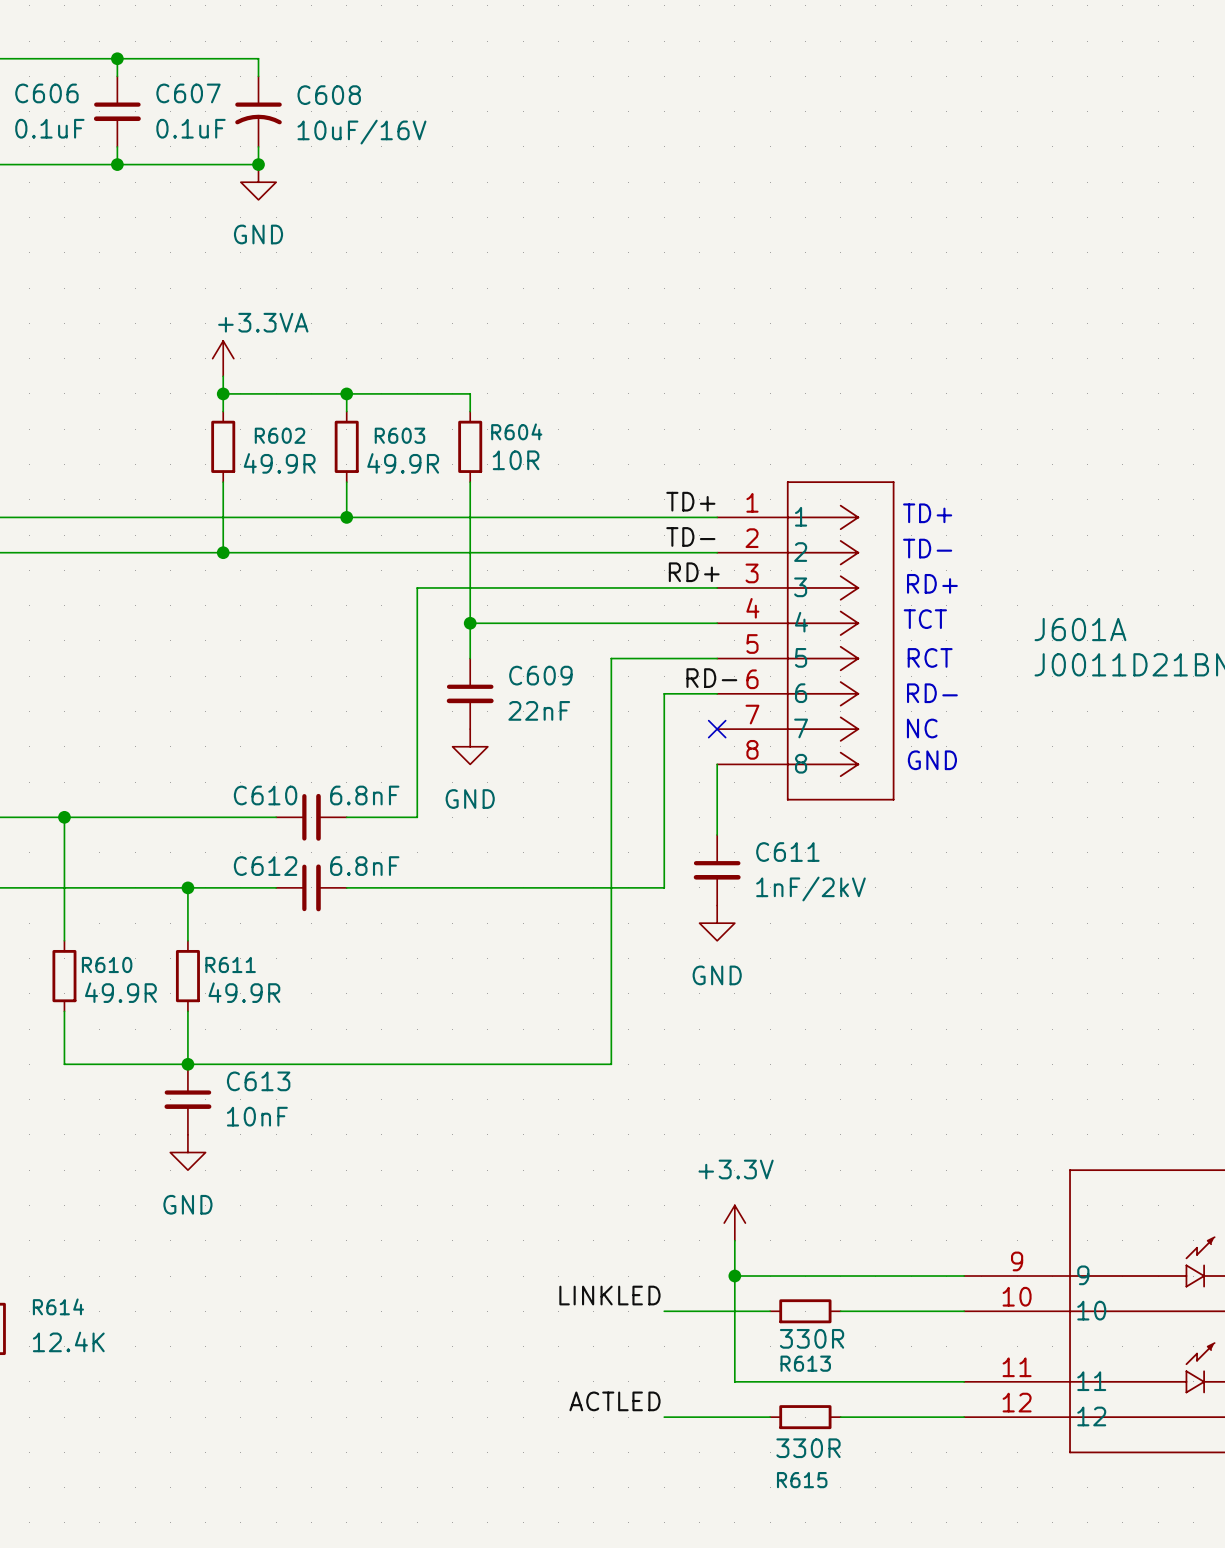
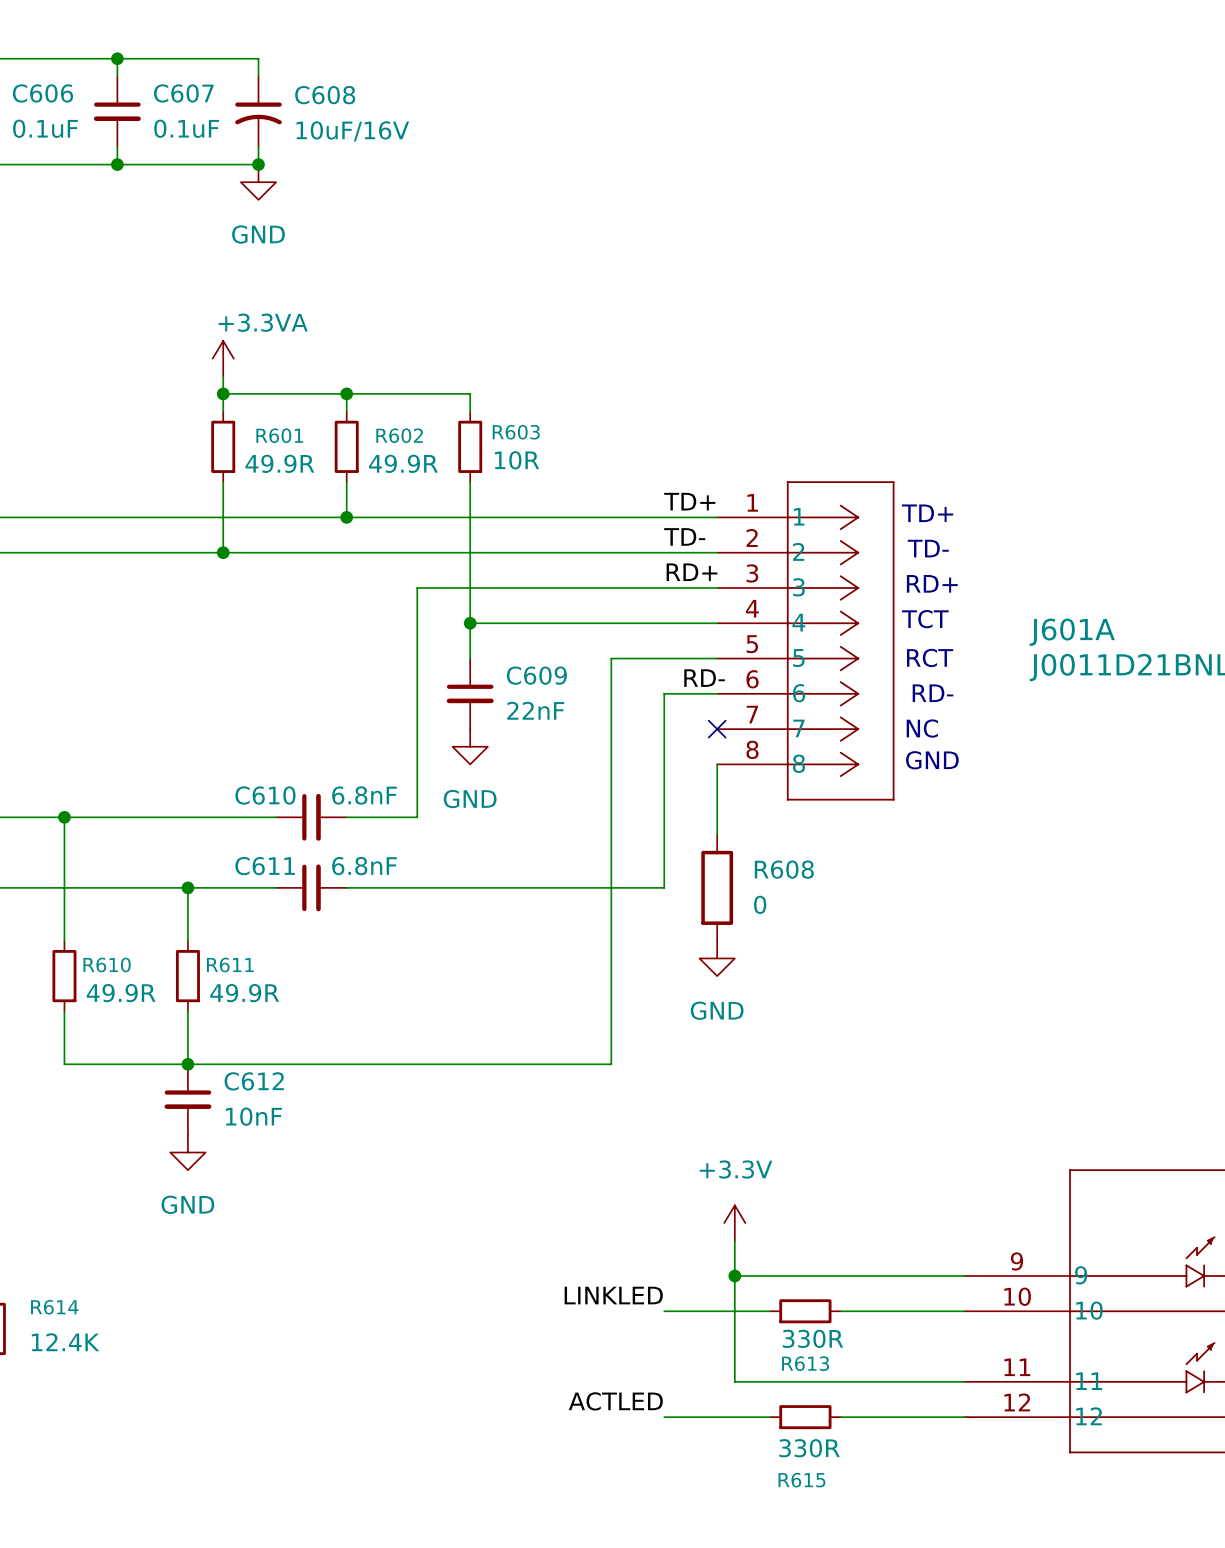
R604 name: R604 (516, 431) -> R603 (516, 432)
R602 name: R602 (280, 435) -> R601 (279, 435)
R603 name: R603 (399, 435) -> R602 (399, 435)
C612 name: C612 (265, 866) -> C611 (265, 866)
C611: 1nF/2kV (717, 870) -> none
R608: none -> 0 (717, 887)
power symbol position: GND (717, 923) -> GND (717, 958)
C613 name: C613 (258, 1081) -> C612 (254, 1081)

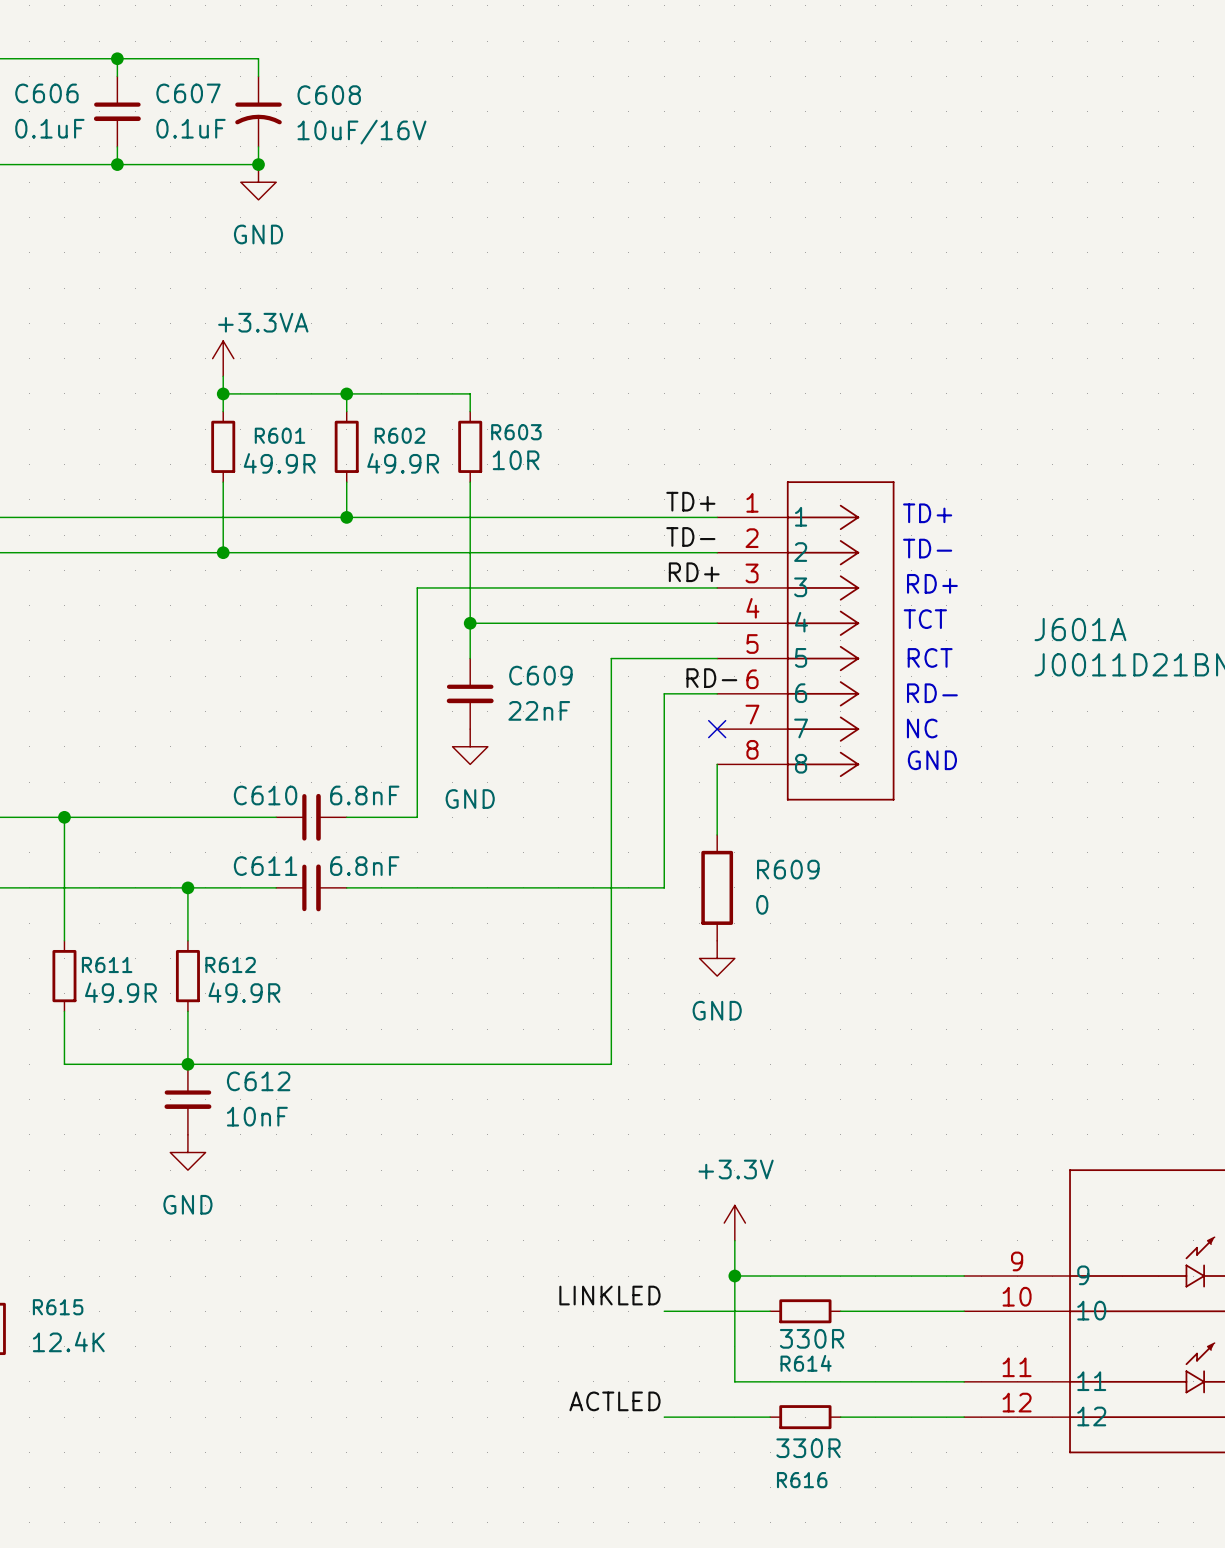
R608 name: R608 (784, 869) -> R609 (788, 869)
R610 name: R610 (107, 964) -> R611 (107, 964)
R611 name: R611 (230, 964) -> R612 (230, 964)
R614 name: R614 (54, 1307) -> R615 (58, 1307)
R613 name: R613 (805, 1363) -> R614 (806, 1363)
R615 name: R615 (801, 1480) -> R616 (802, 1480)

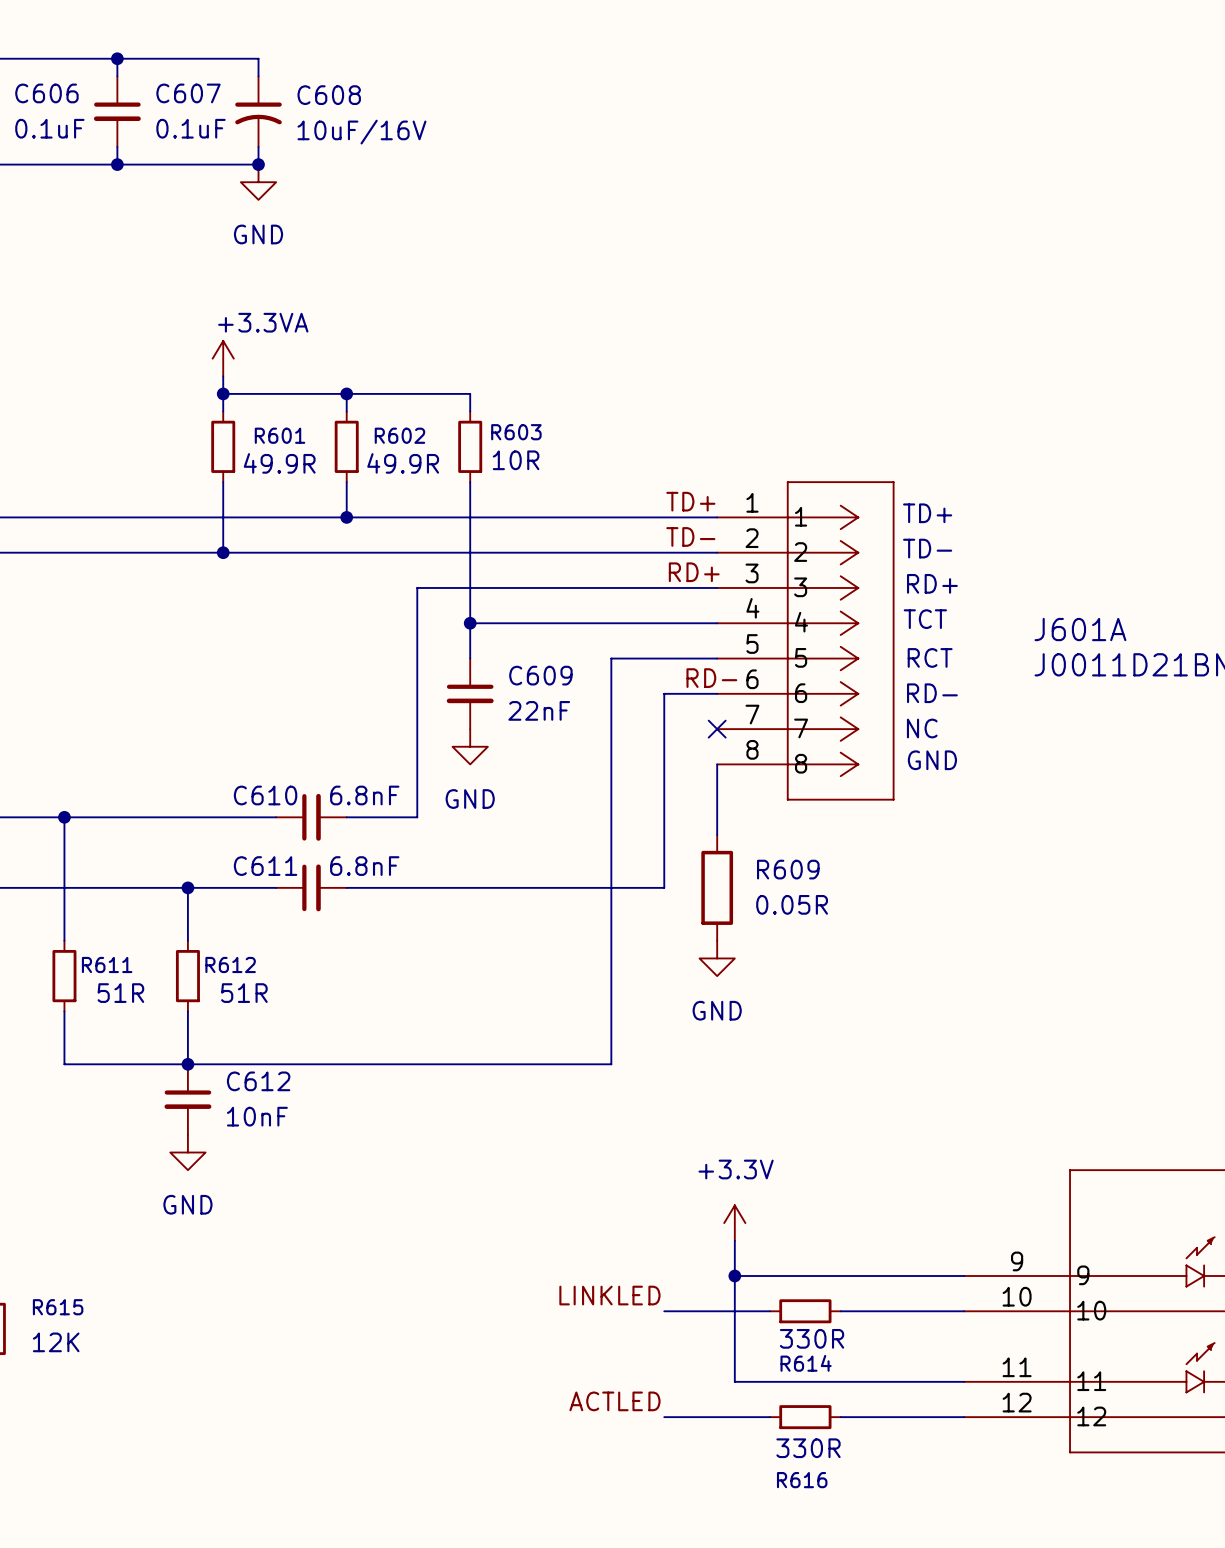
R609 value: 0 (762, 904) -> 0.05R (792, 904)
R611 value: 49.9R (120, 992) -> 51R (120, 993)
R612 value: 49.9R (244, 992) -> 51R (244, 993)
R615 value: 12.4K (68, 1341) -> 12K (56, 1342)

